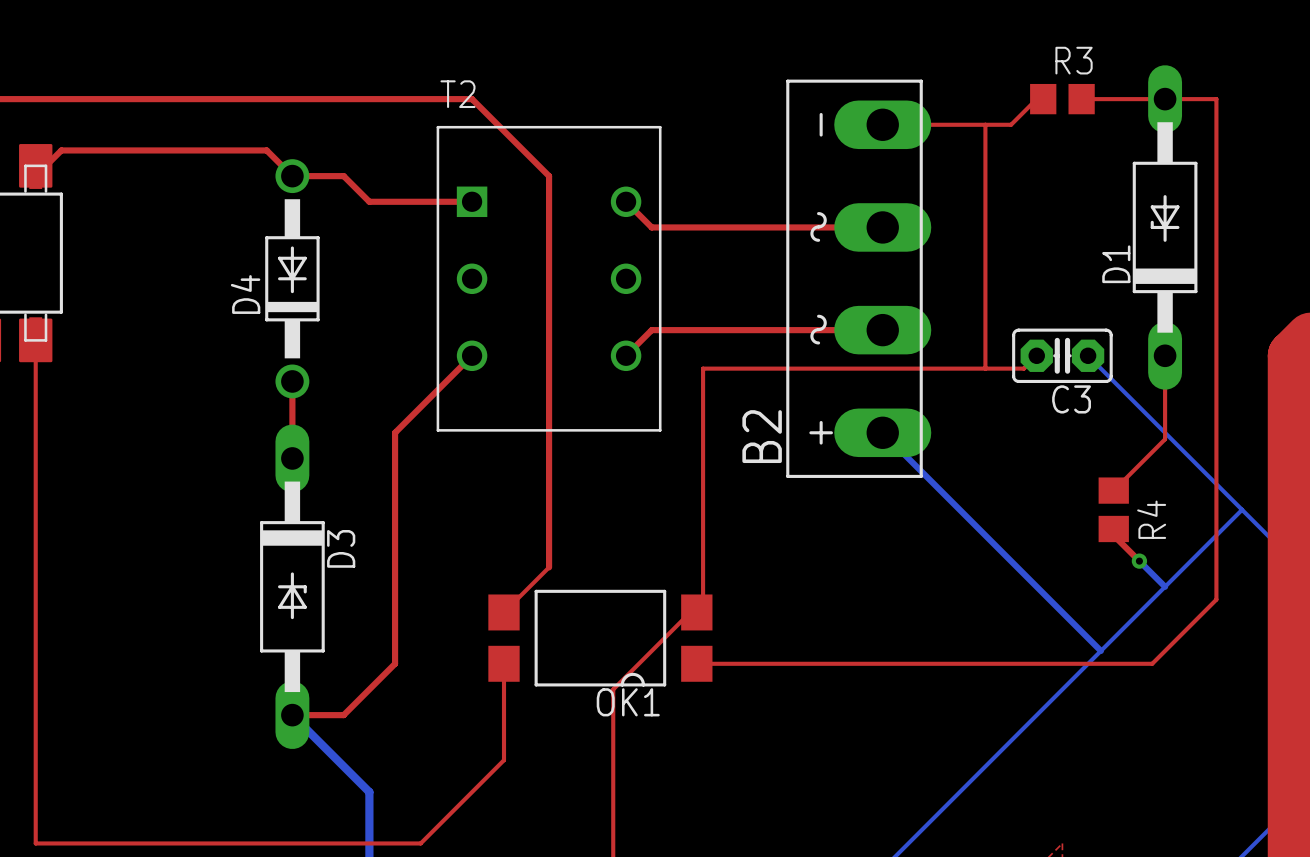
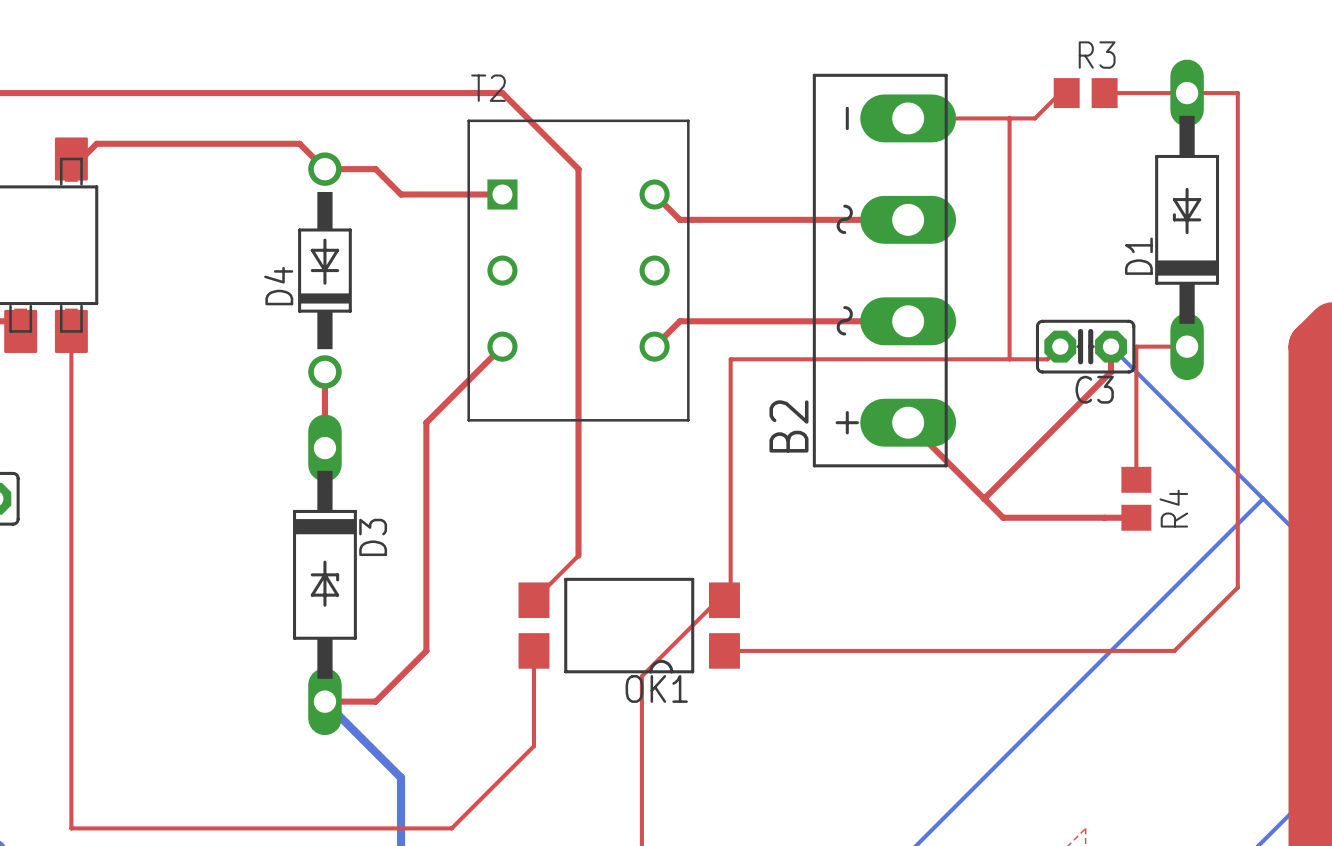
top track: none -> (1111, 346) (1111, 372) (984, 498)
top track: (1165, 355) (1165, 439) (1113, 490) -> (1187, 346) (1136, 346) (1136, 479)
bottom track: (882, 432) (1100, 650) -> none
top track: (1113, 528) (1113, 535) (1139, 561) -> (1136, 517) (1003, 517) (908, 422)
bottom track: (1139, 561) (1165, 586) -> none
via: (1139, 561) -> none

